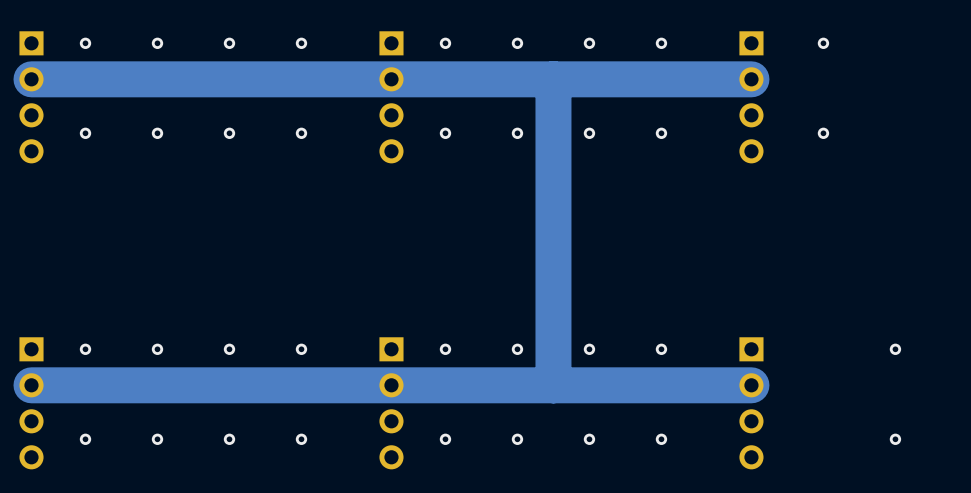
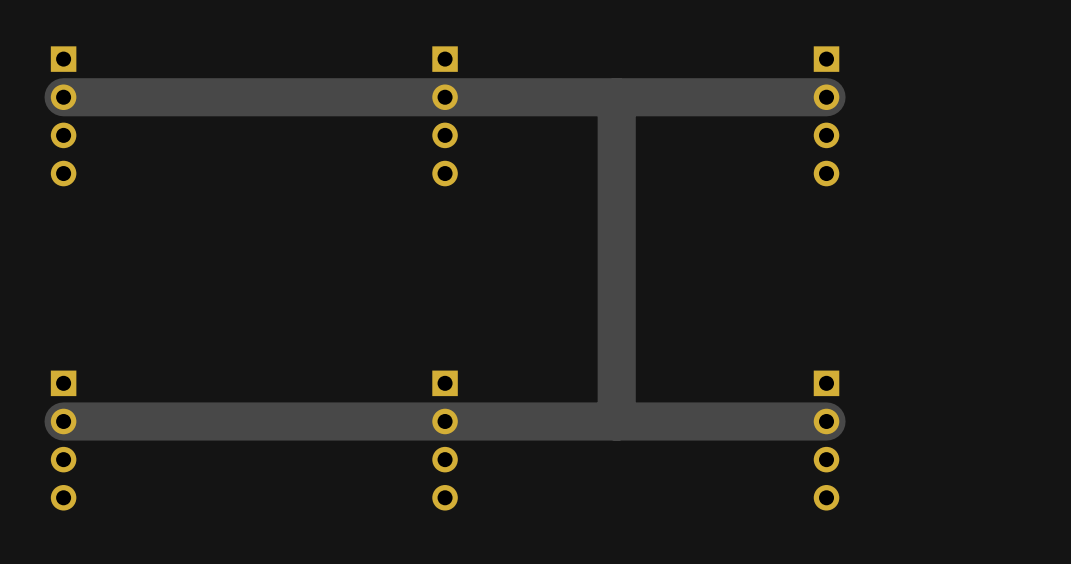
via: (85, 43) -> none
via: (157, 43) -> none
via: (229, 43) -> none
via: (301, 43) -> none
via: (445, 43) -> none
via: (517, 43) -> none
via: (589, 43) -> none
via: (661, 43) -> none
via: (823, 43) -> none
via: (85, 133) -> none
via: (157, 133) -> none
via: (229, 133) -> none
via: (301, 133) -> none
via: (445, 133) -> none
via: (517, 133) -> none
via: (589, 133) -> none
via: (661, 133) -> none
via: (823, 133) -> none
via: (85, 349) -> none
via: (157, 349) -> none
via: (229, 349) -> none
via: (301, 349) -> none
via: (445, 349) -> none
via: (517, 349) -> none
via: (589, 349) -> none
via: (661, 349) -> none
via: (895, 349) -> none
via: (85, 439) -> none
via: (157, 439) -> none
via: (229, 439) -> none
via: (301, 439) -> none
via: (445, 439) -> none
via: (517, 439) -> none
via: (589, 439) -> none
via: (661, 439) -> none
via: (895, 439) -> none

